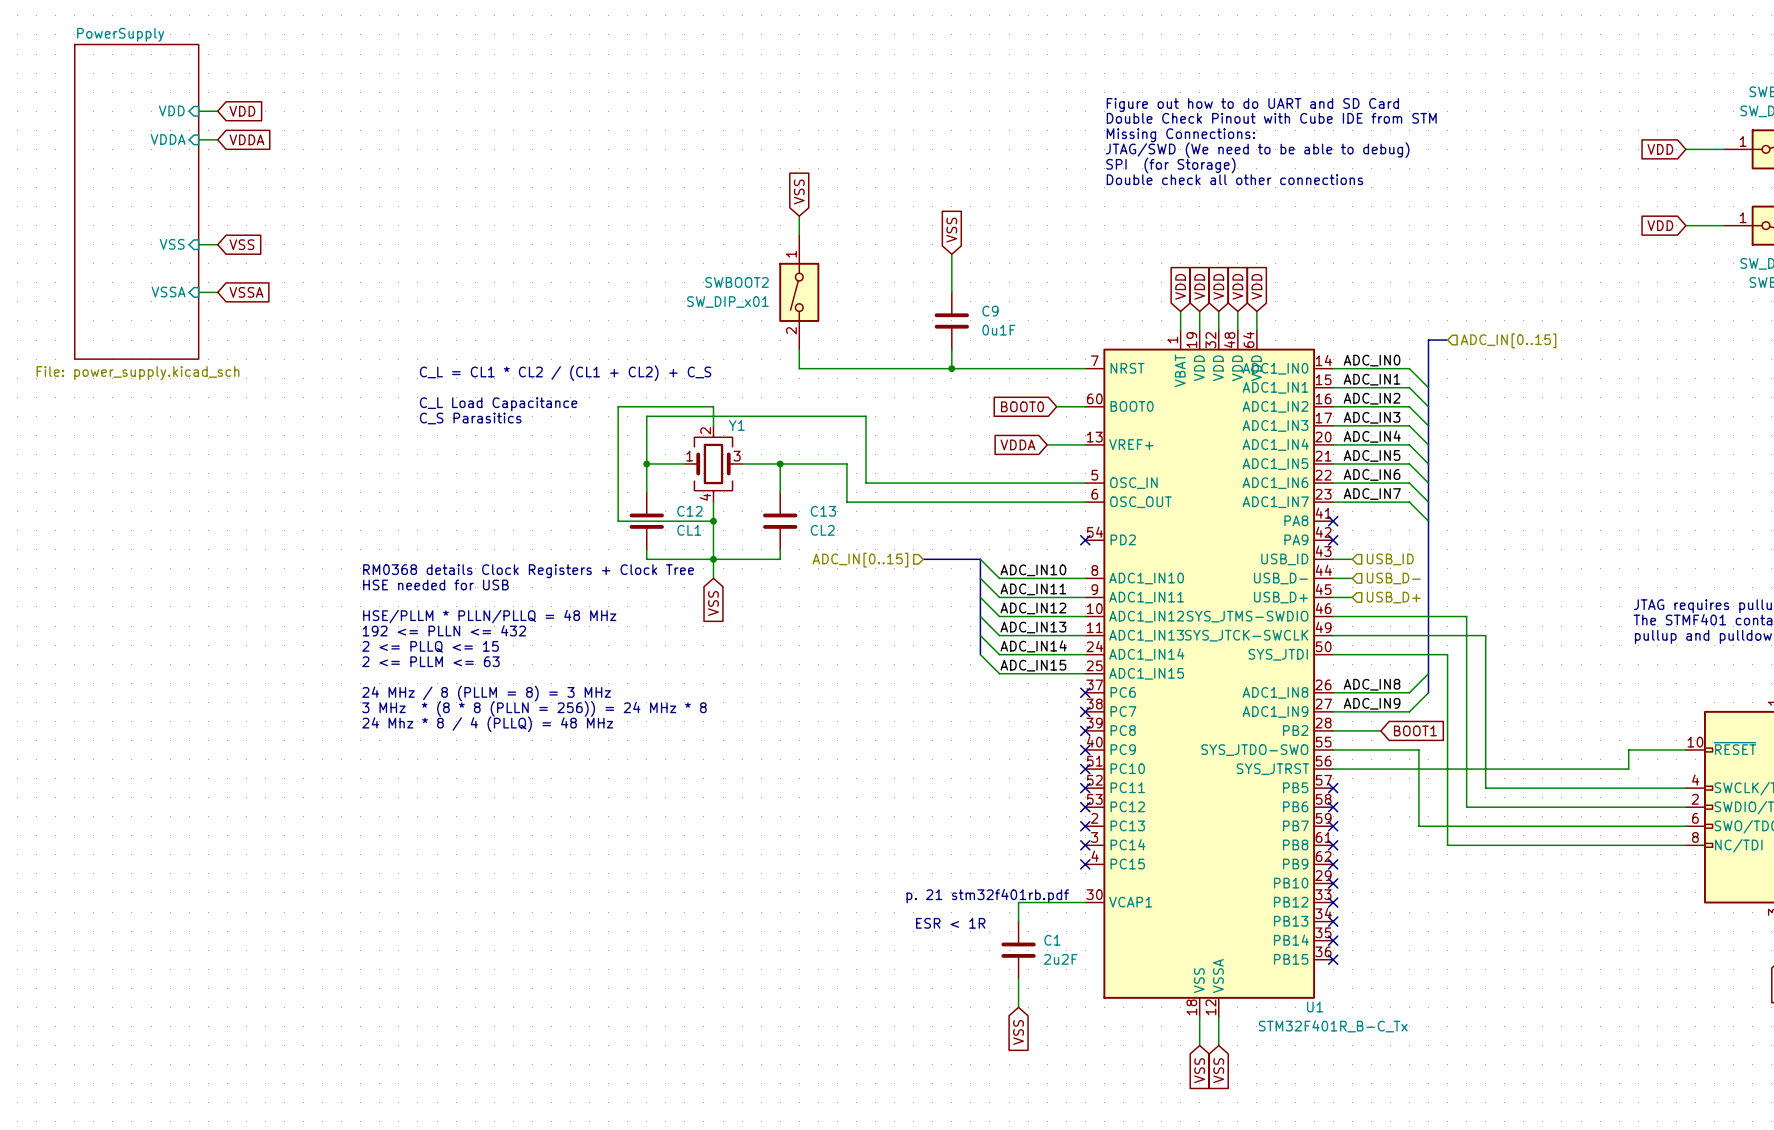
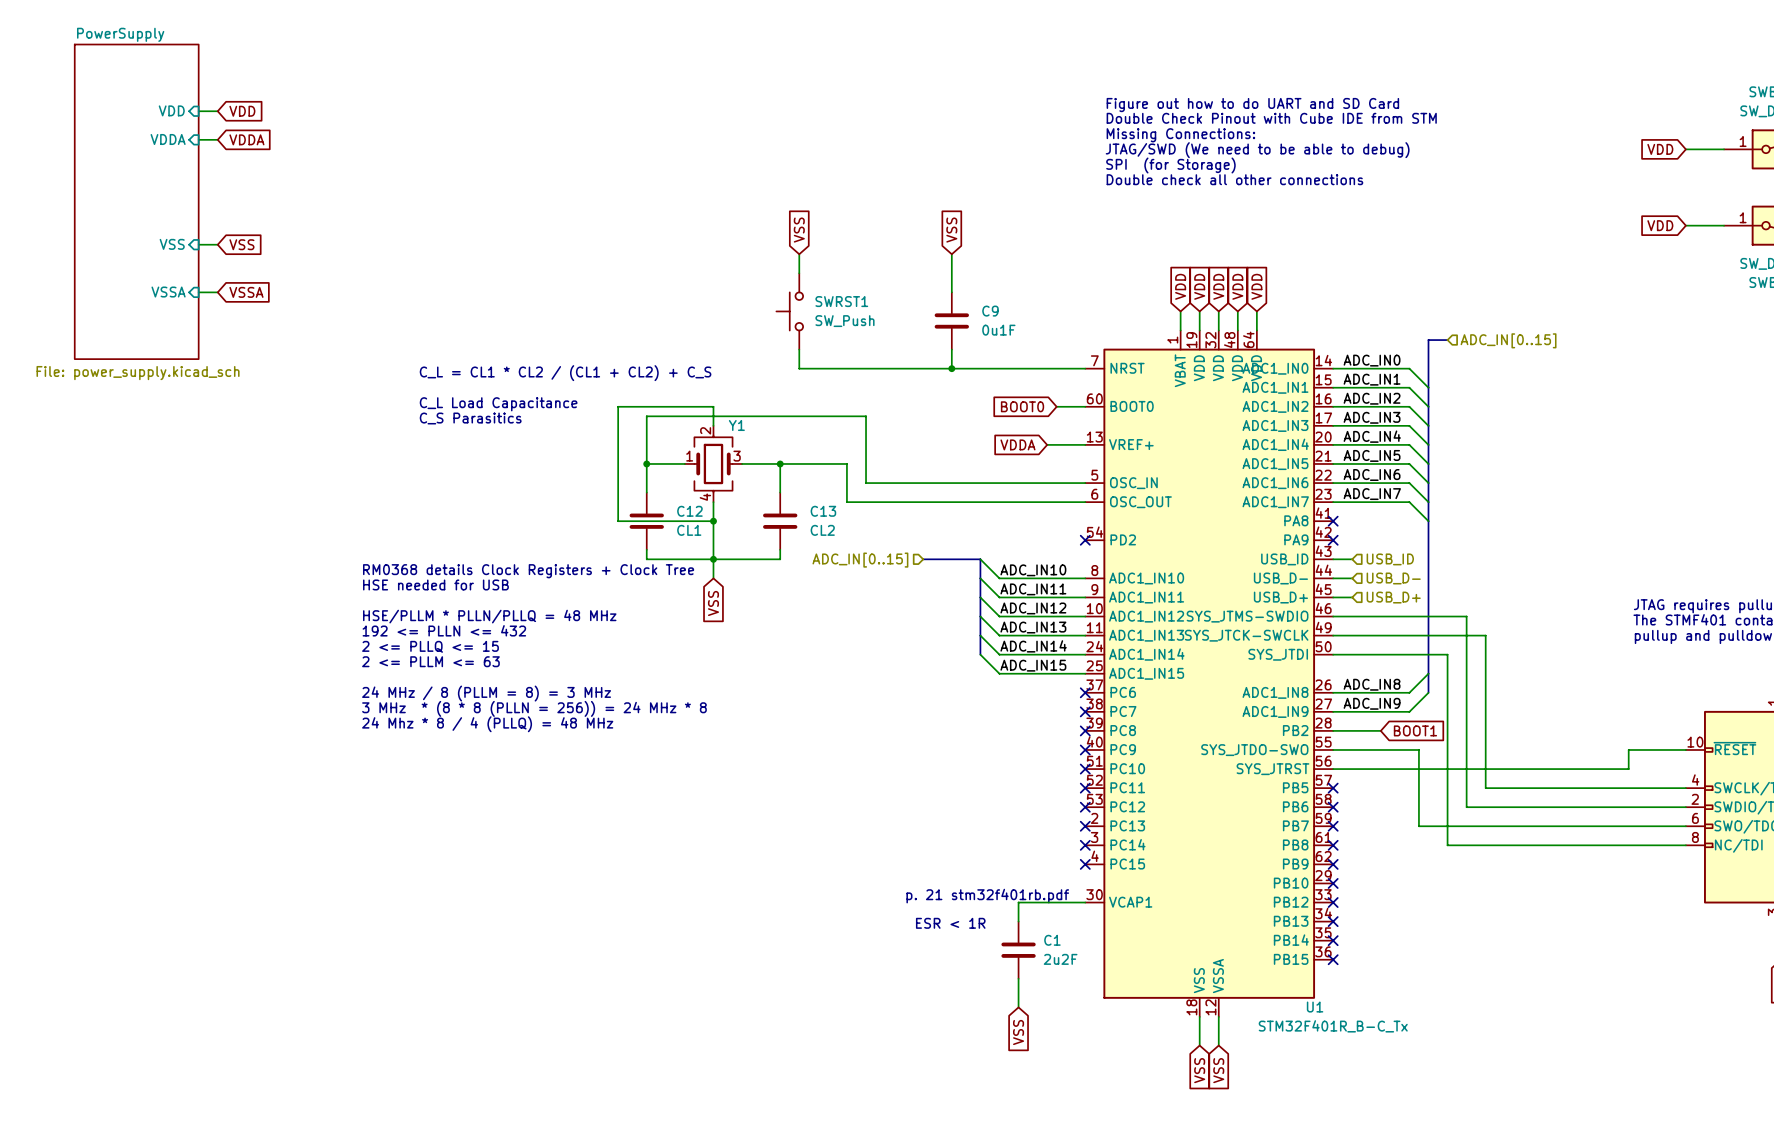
global label position: VSS (799, 191) -> VSS (799, 230)
SWBOOT2: SW_DIP_x01 (799, 292) -> none
SWRST1: none -> SW_Push (789, 311)

